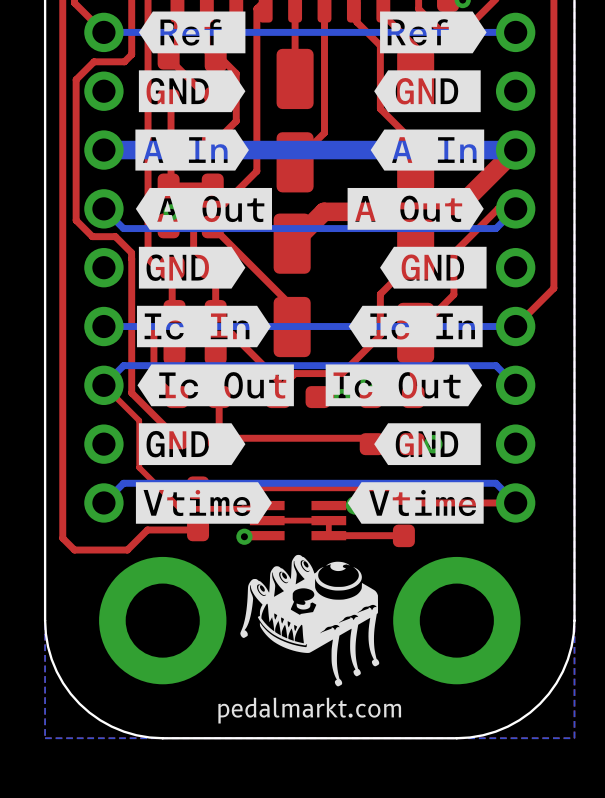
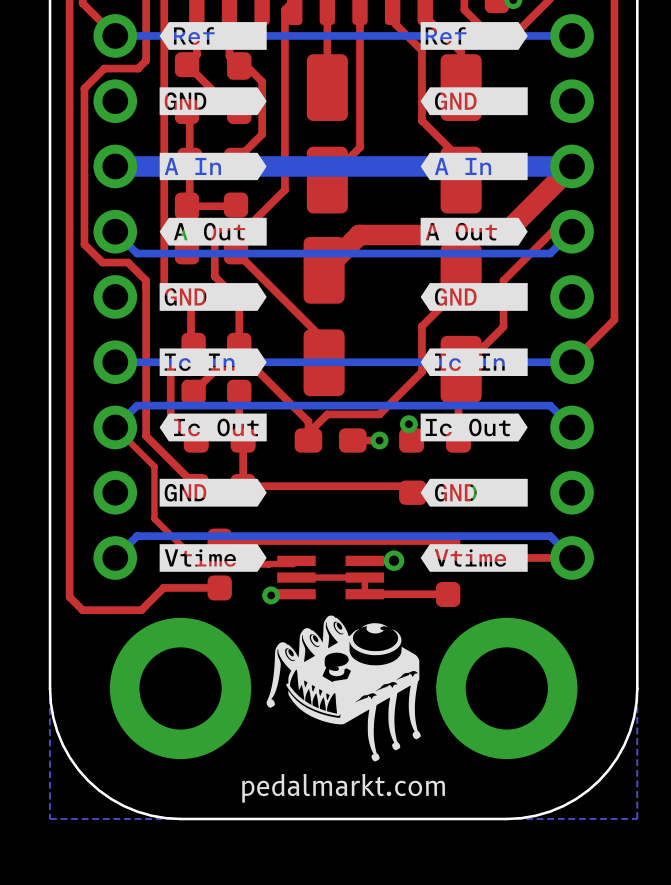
drawing shape: [138, 11, 246, 54] -> [159, 22, 267, 50]
drawing shape: [380, 11, 487, 54] -> [420, 22, 528, 50]
drawing shape: [138, 70, 246, 113] -> [159, 87, 267, 116]
drawing shape: [374, 70, 481, 113] -> [420, 87, 528, 116]
drawing shape: [135, 129, 249, 171] -> [159, 152, 267, 181]
drawing shape: [370, 129, 485, 171] -> [420, 152, 528, 181]
drawing shape: [135, 187, 272, 230] -> [159, 217, 267, 246]
drawing shape: [347, 187, 484, 230] -> [420, 217, 528, 246]
drawing shape: [138, 246, 246, 289] -> [159, 283, 267, 311]
drawing shape: [380, 246, 487, 289] -> [420, 283, 528, 311]
drawing shape: [136, 305, 271, 348] -> [159, 348, 267, 377]
drawing shape: [348, 305, 483, 348] -> [420, 348, 528, 377]
drawing: [137, 364, 294, 407] -> none
drawing: [325, 364, 483, 407] -> none
drawing: none -> [159, 413, 267, 442]
drawing: none -> [420, 413, 528, 442]
drawing shape: [138, 423, 246, 466] -> [159, 478, 267, 507]
drawing shape: [374, 423, 481, 466] -> [420, 478, 528, 507]
drawing shape: [135, 482, 272, 524] -> [159, 544, 267, 572]
drawing shape: [347, 482, 484, 524] -> [420, 544, 528, 572]

